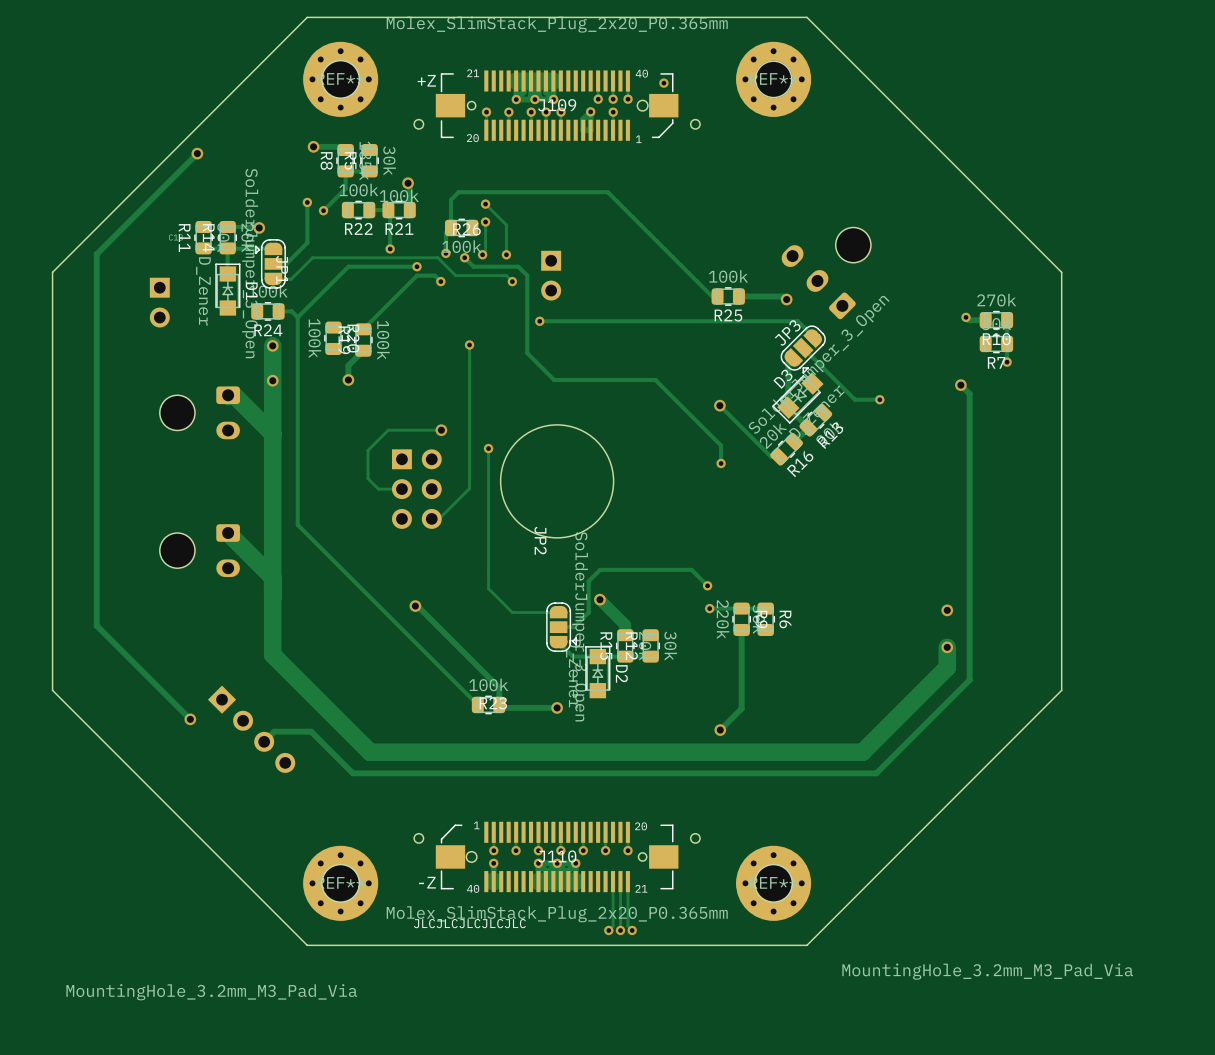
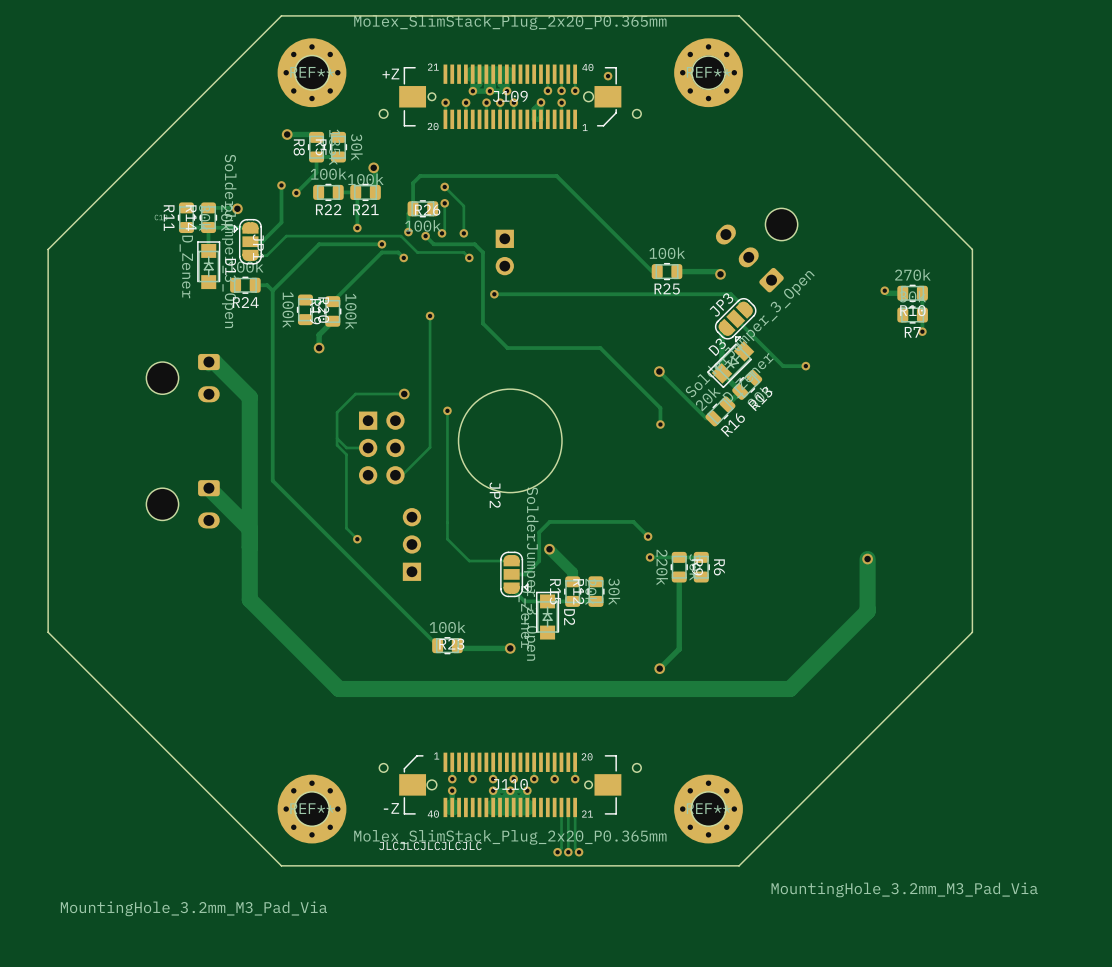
track: (197, 153) (96, 254) (96, 625) (190, 719) -> none
via: (197, 153) -> none
part: (159, 302) -> none
track: (274, 344) (272, 345) (272, 433) (276, 429) -> none
via: (272, 345) -> none
via: (272, 380) -> none
track: (960, 385) (969, 393) (969, 680) (876, 773) (352, 773) (311, 731) (274, 731) (264, 741) -> none
via: (960, 385) -> none
track: none -> (337, 438) (337, 445) (346, 454) (346, 528) (357, 539)
via: none -> (357, 539)
part: none -> (411, 544)
track: (415, 606) (499, 687) (499, 704) -> none
via: (415, 606) -> none
track: none -> (867, 559) (867, 592)
via: (947, 647) -> none
via: (190, 719) -> none
part: (251, 729) -> none

